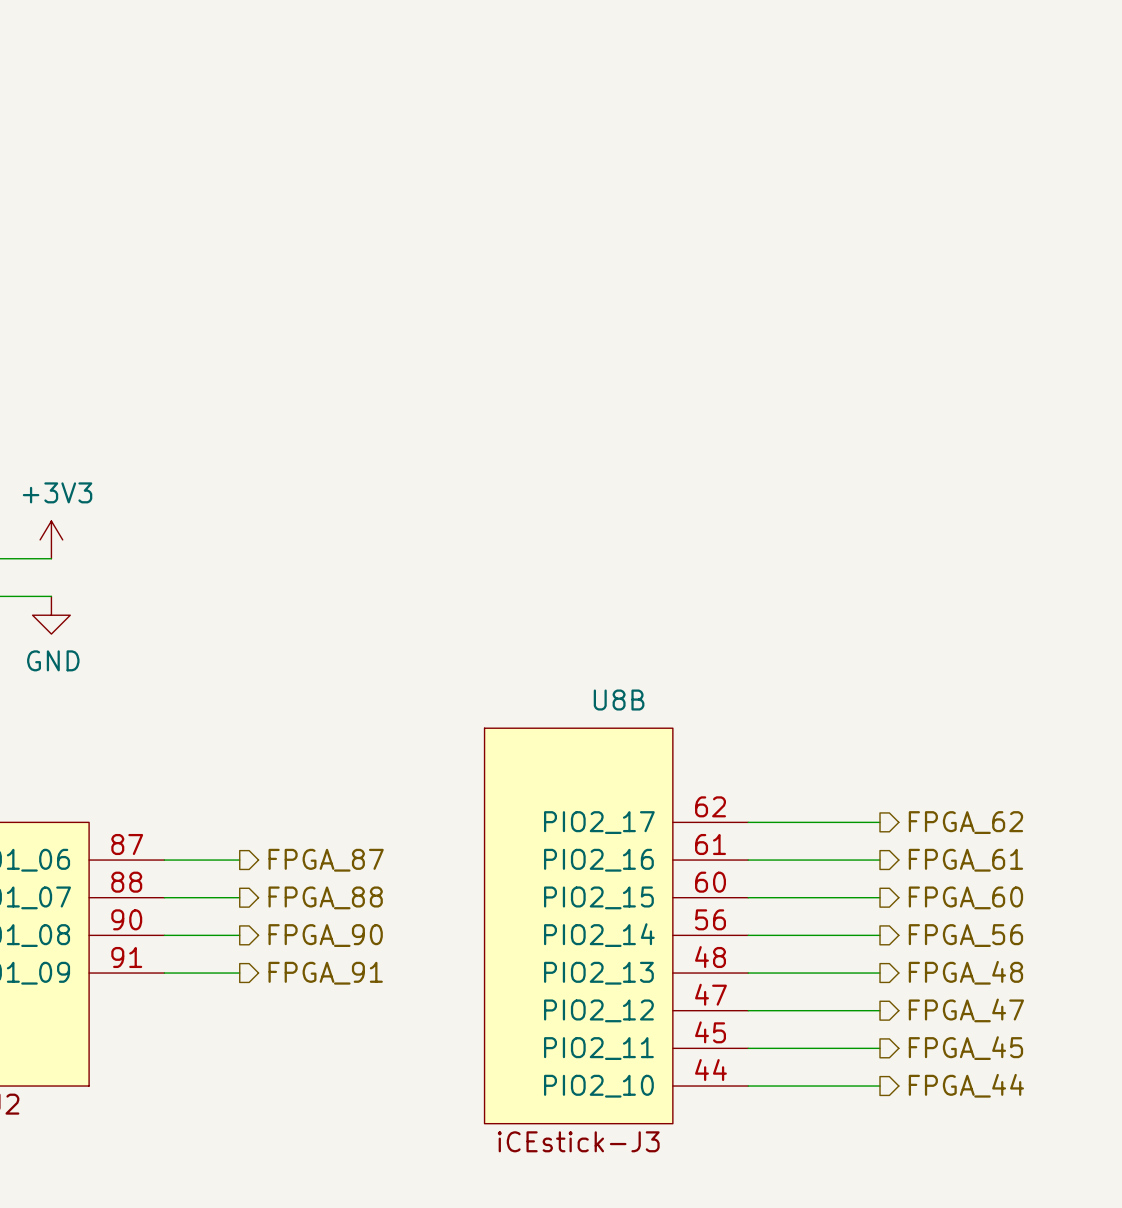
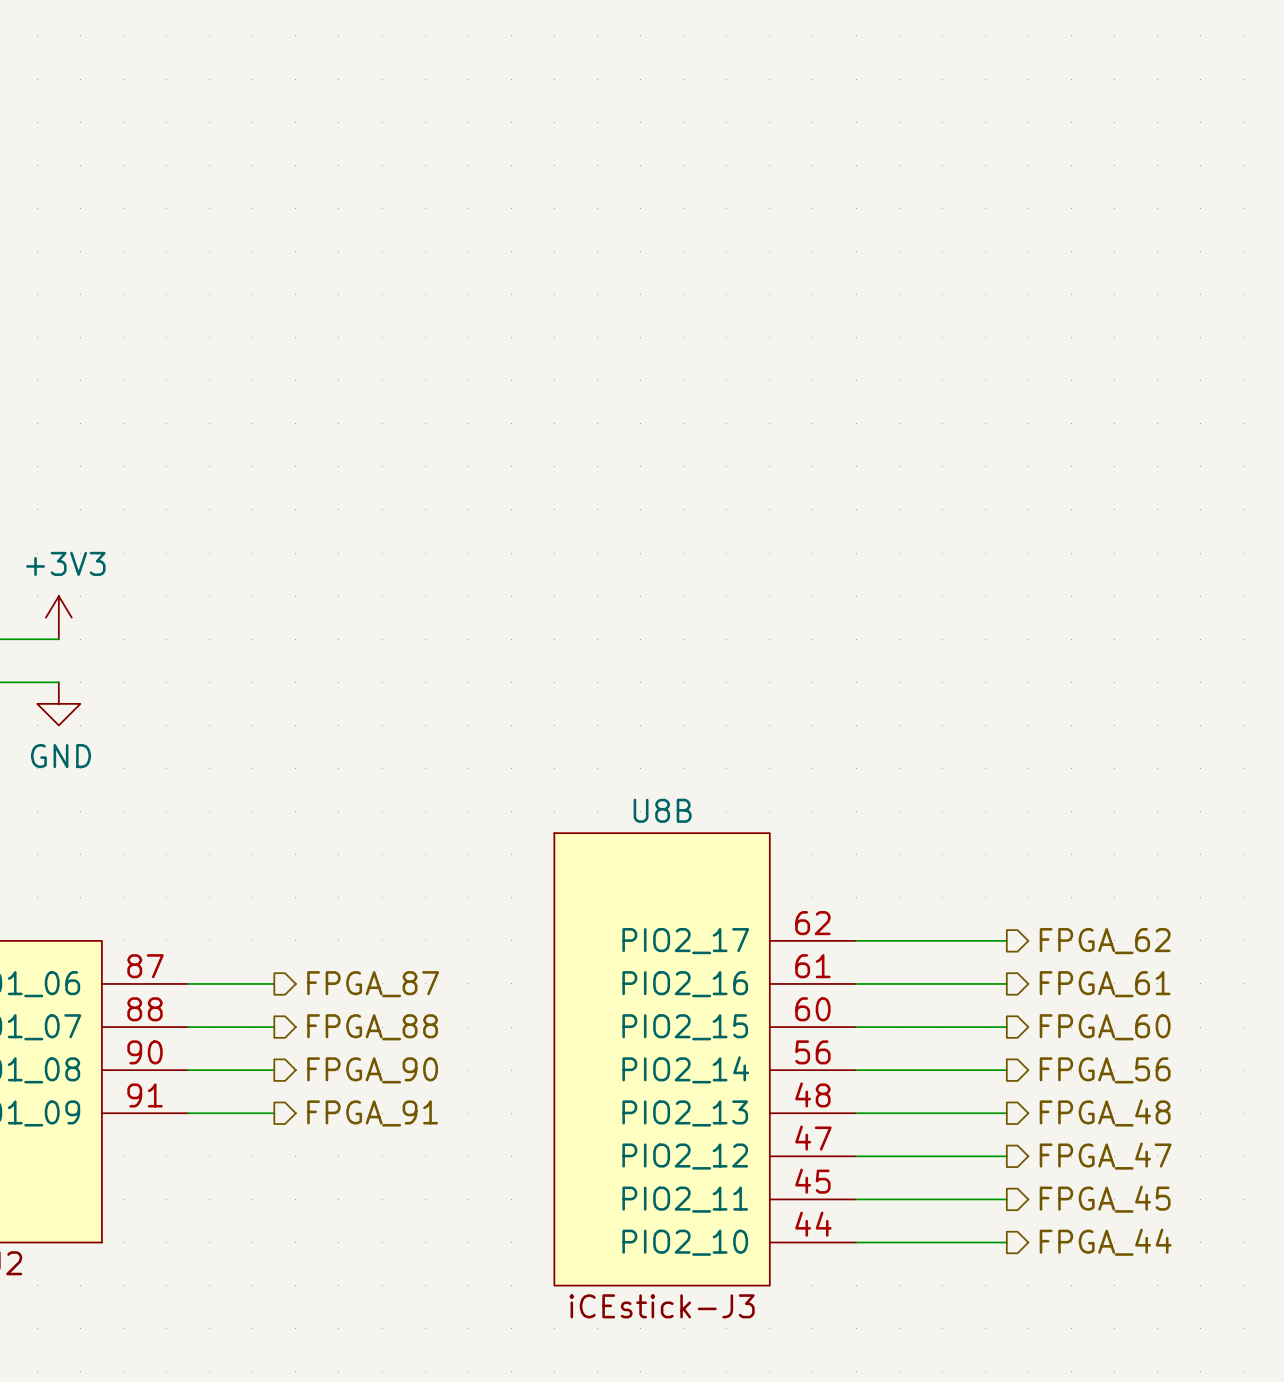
U8B name position: U8B (619, 700) -> U8B (662, 810)

